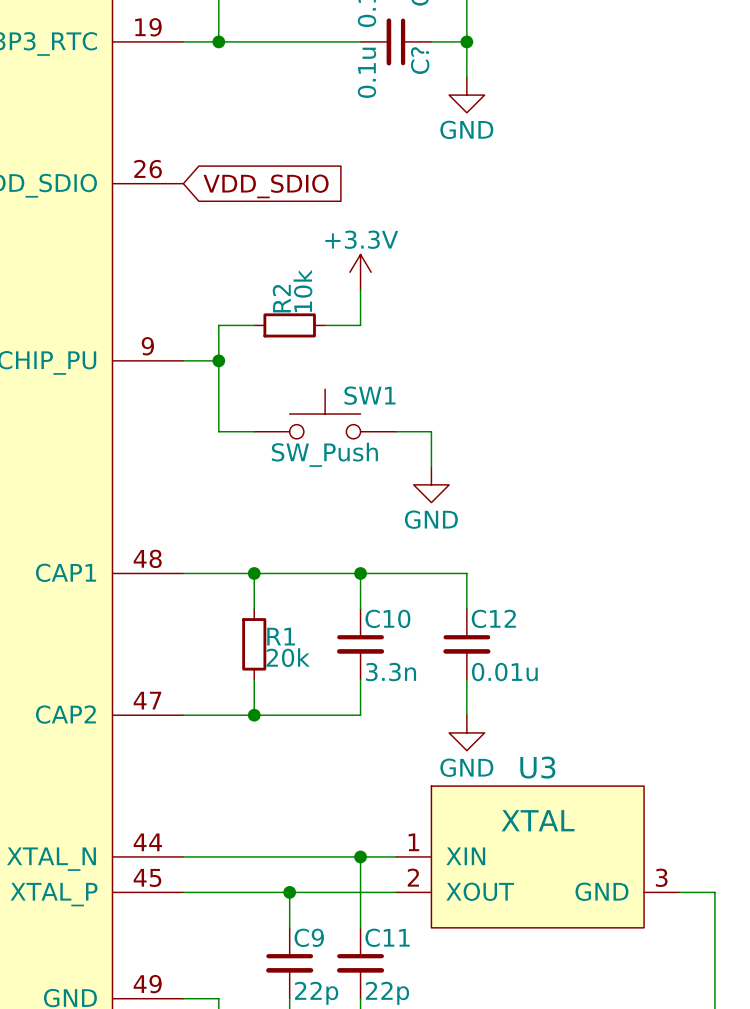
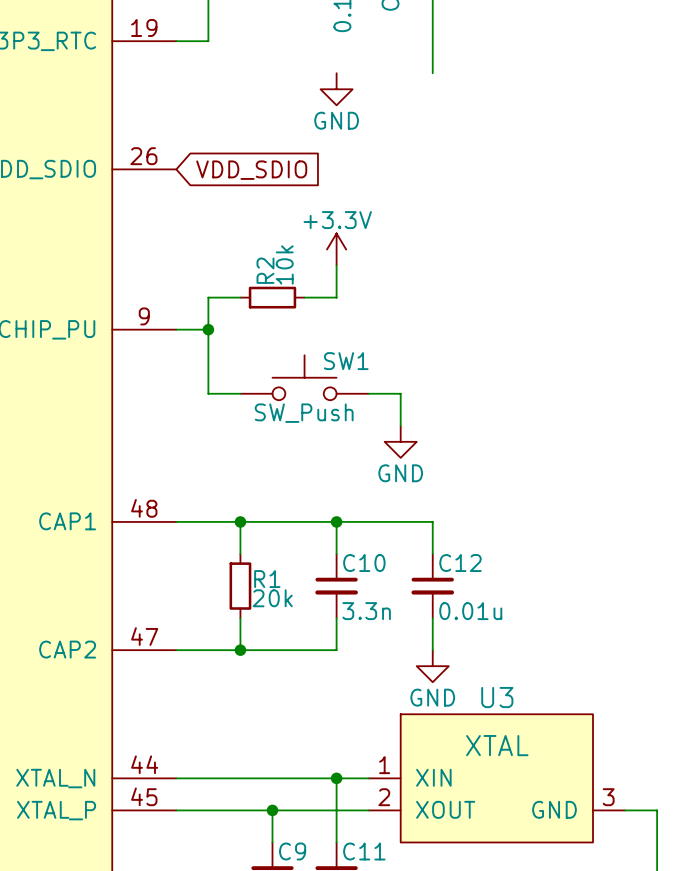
wire: (218, 41) (360, 41) -> none
junction: (218, 41) -> none
C?: 0.1u (395, 41) -> none
wire: (431, 41) (466, 41) -> none
junction: (466, 41) -> none
power symbol position: GND (466, 95) -> GND (336, 89)

